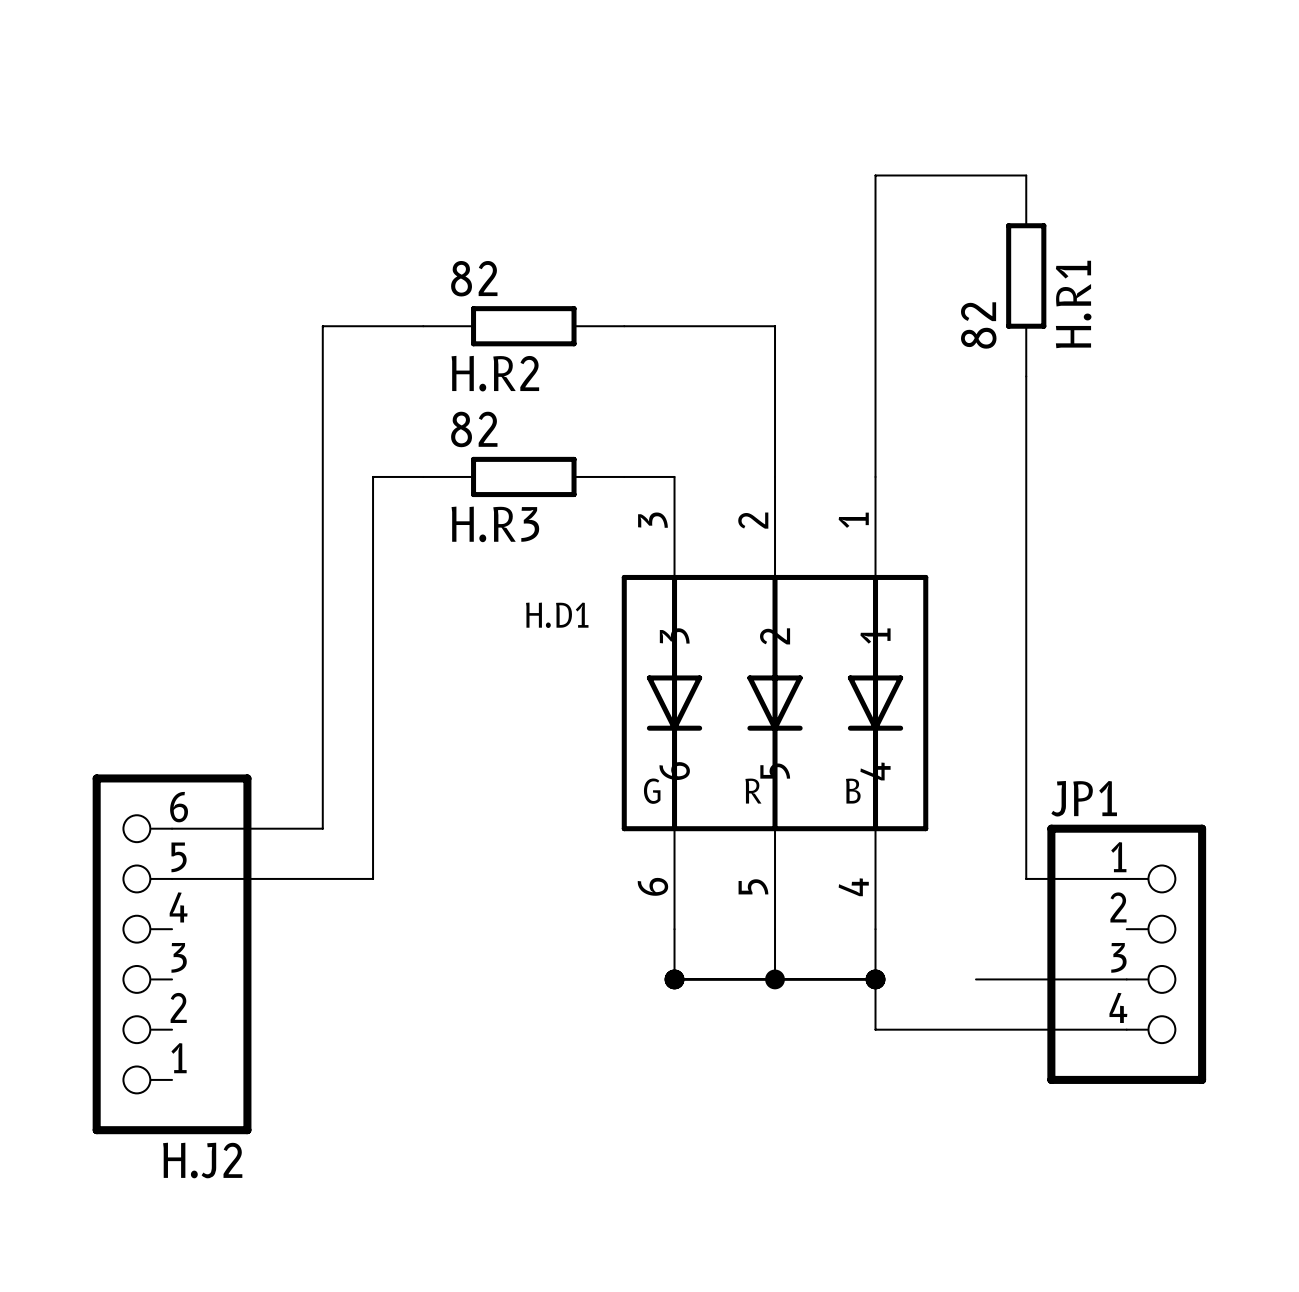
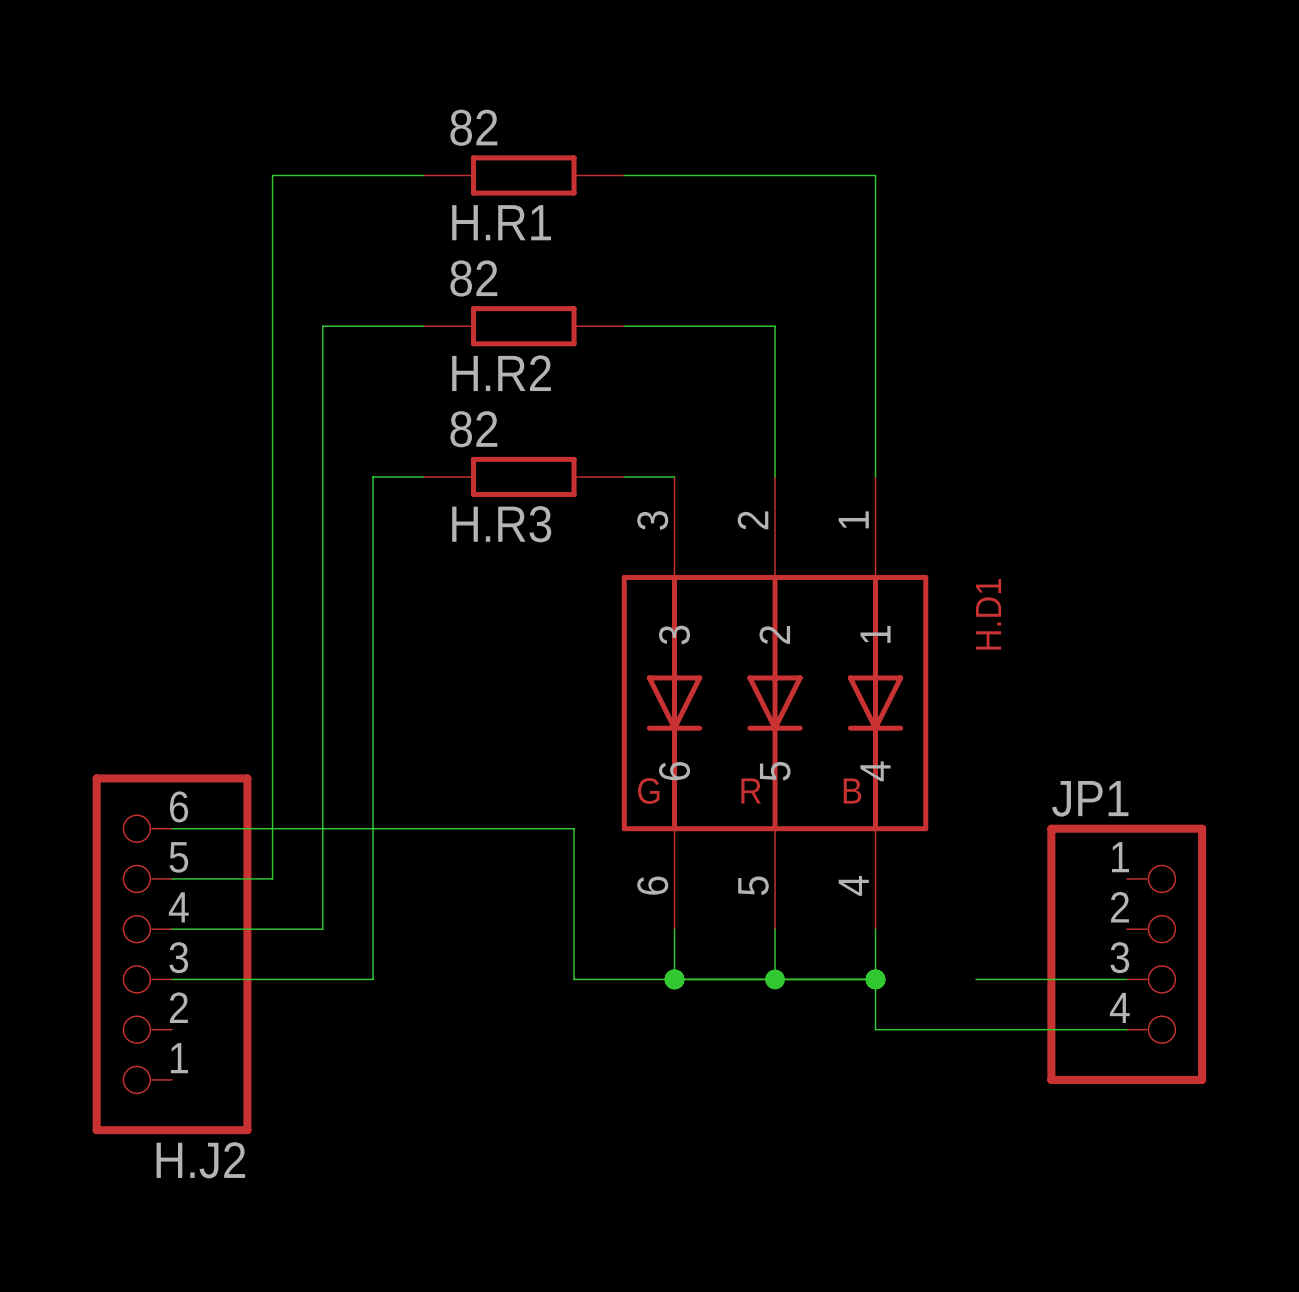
wire: none -> (423, 175) (272, 175) (272, 878)
wire: (875, 175) (1026, 175) -> (875, 175) (624, 175)
H.R1 rotation: 0° (1026, 275) -> 90° clockwise (523, 175)
H.R1 position: (1026, 275) -> (523, 175)
wire: (1026, 376) (1026, 878) (1126, 878) -> none
H.D1 name rotation: 0° (557, 615) -> 90° counterclockwise (988, 614)
H.D1 name position: H.D1 (557, 615) -> H.D1 (988, 614)
wire: (272, 878) (373, 878) -> (172, 979) (373, 979) (373, 878)
wire: none -> (172, 929) (322, 929) (322, 828) (574, 828) (574, 979) (674, 979)

